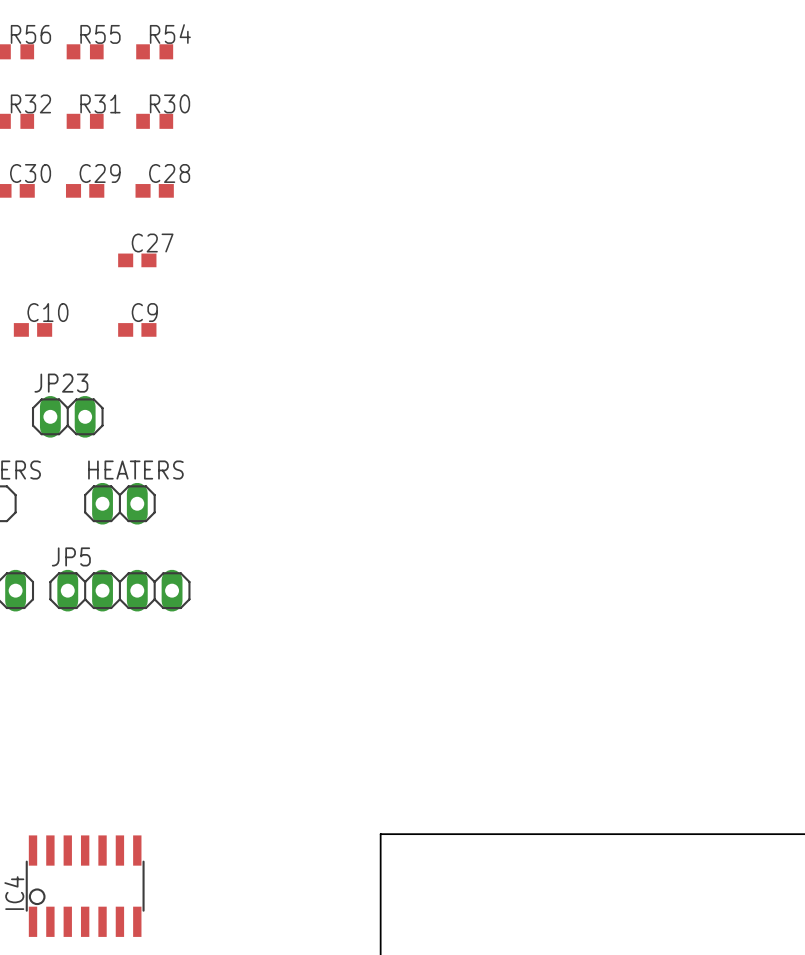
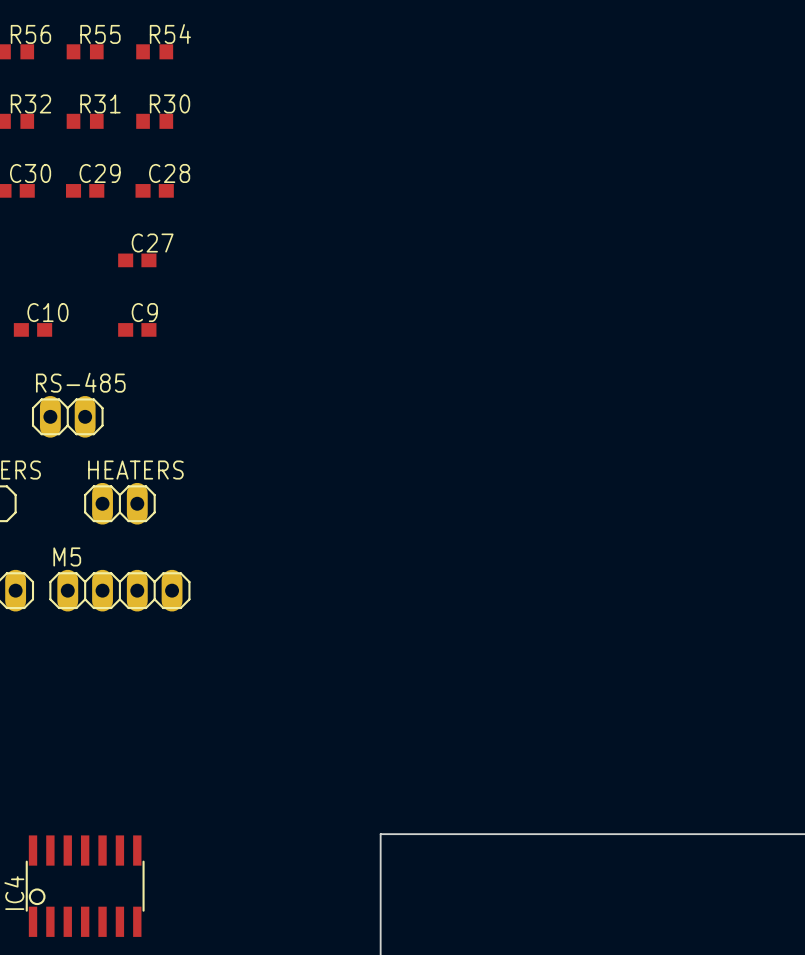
JP23 name: JP23 (61, 383) -> RS-485 (80, 382)
JP5 name: JP5 (71, 556) -> M5 (67, 556)

